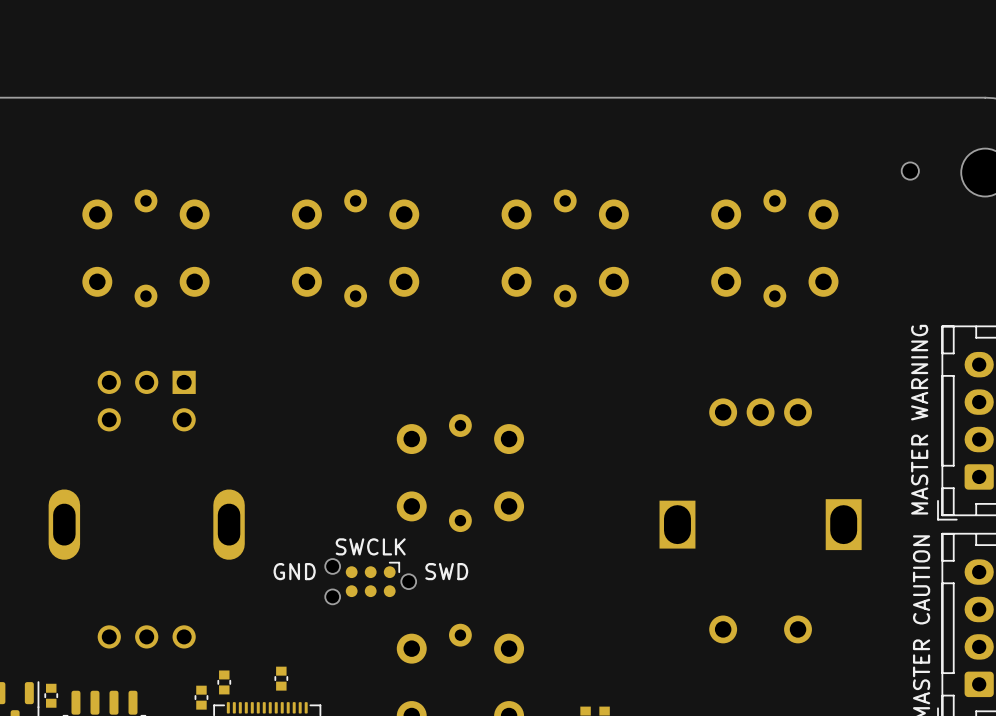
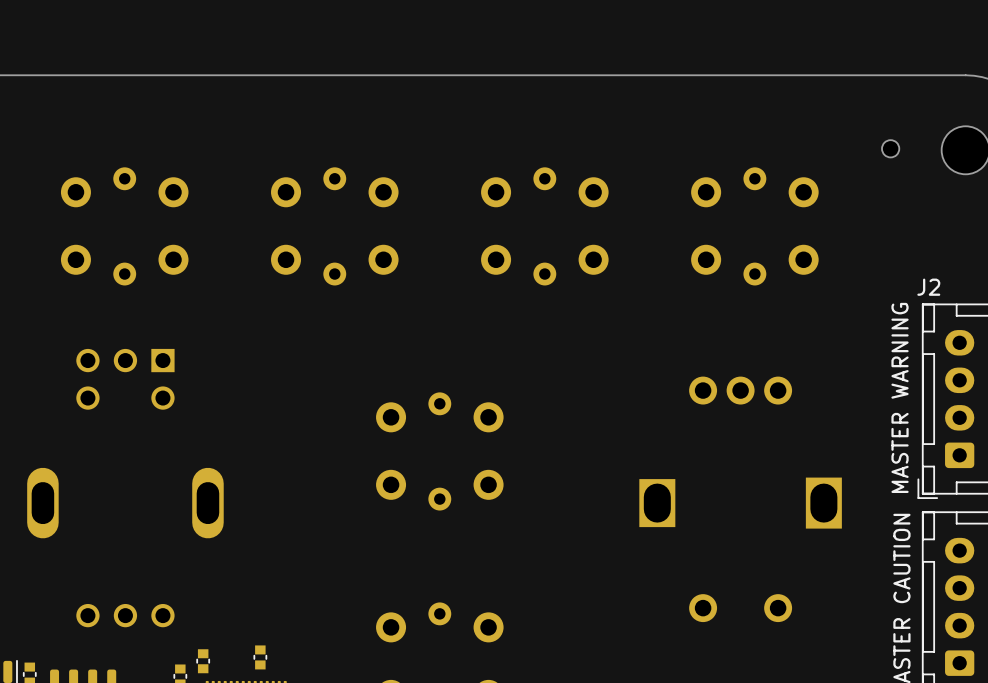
J2 name: none -> J2 (928, 287)
text: SWCLK (370, 546) -> none
text: GND (294, 571) -> none
text: SWD (446, 571) -> none
part: (370, 581) -> none

